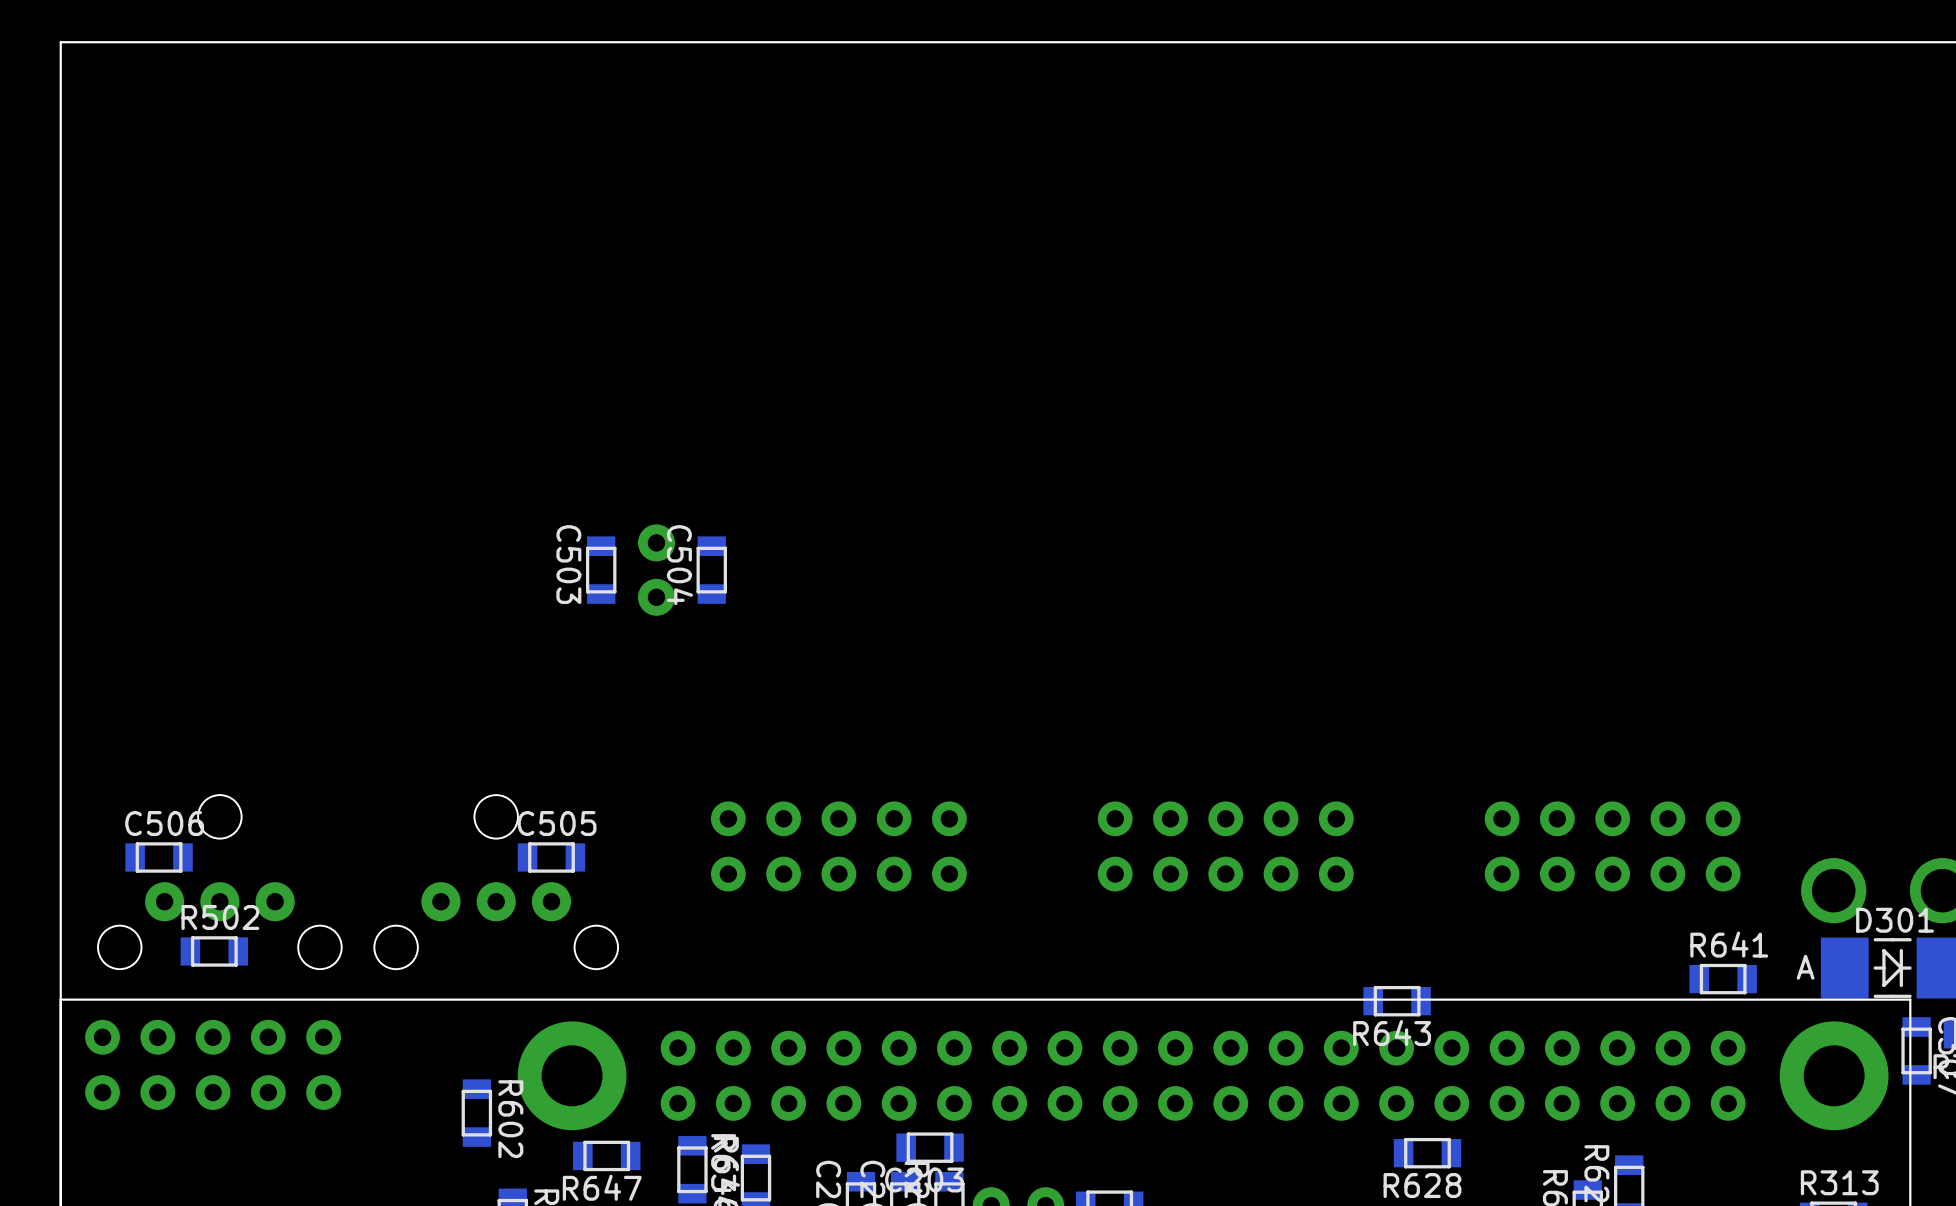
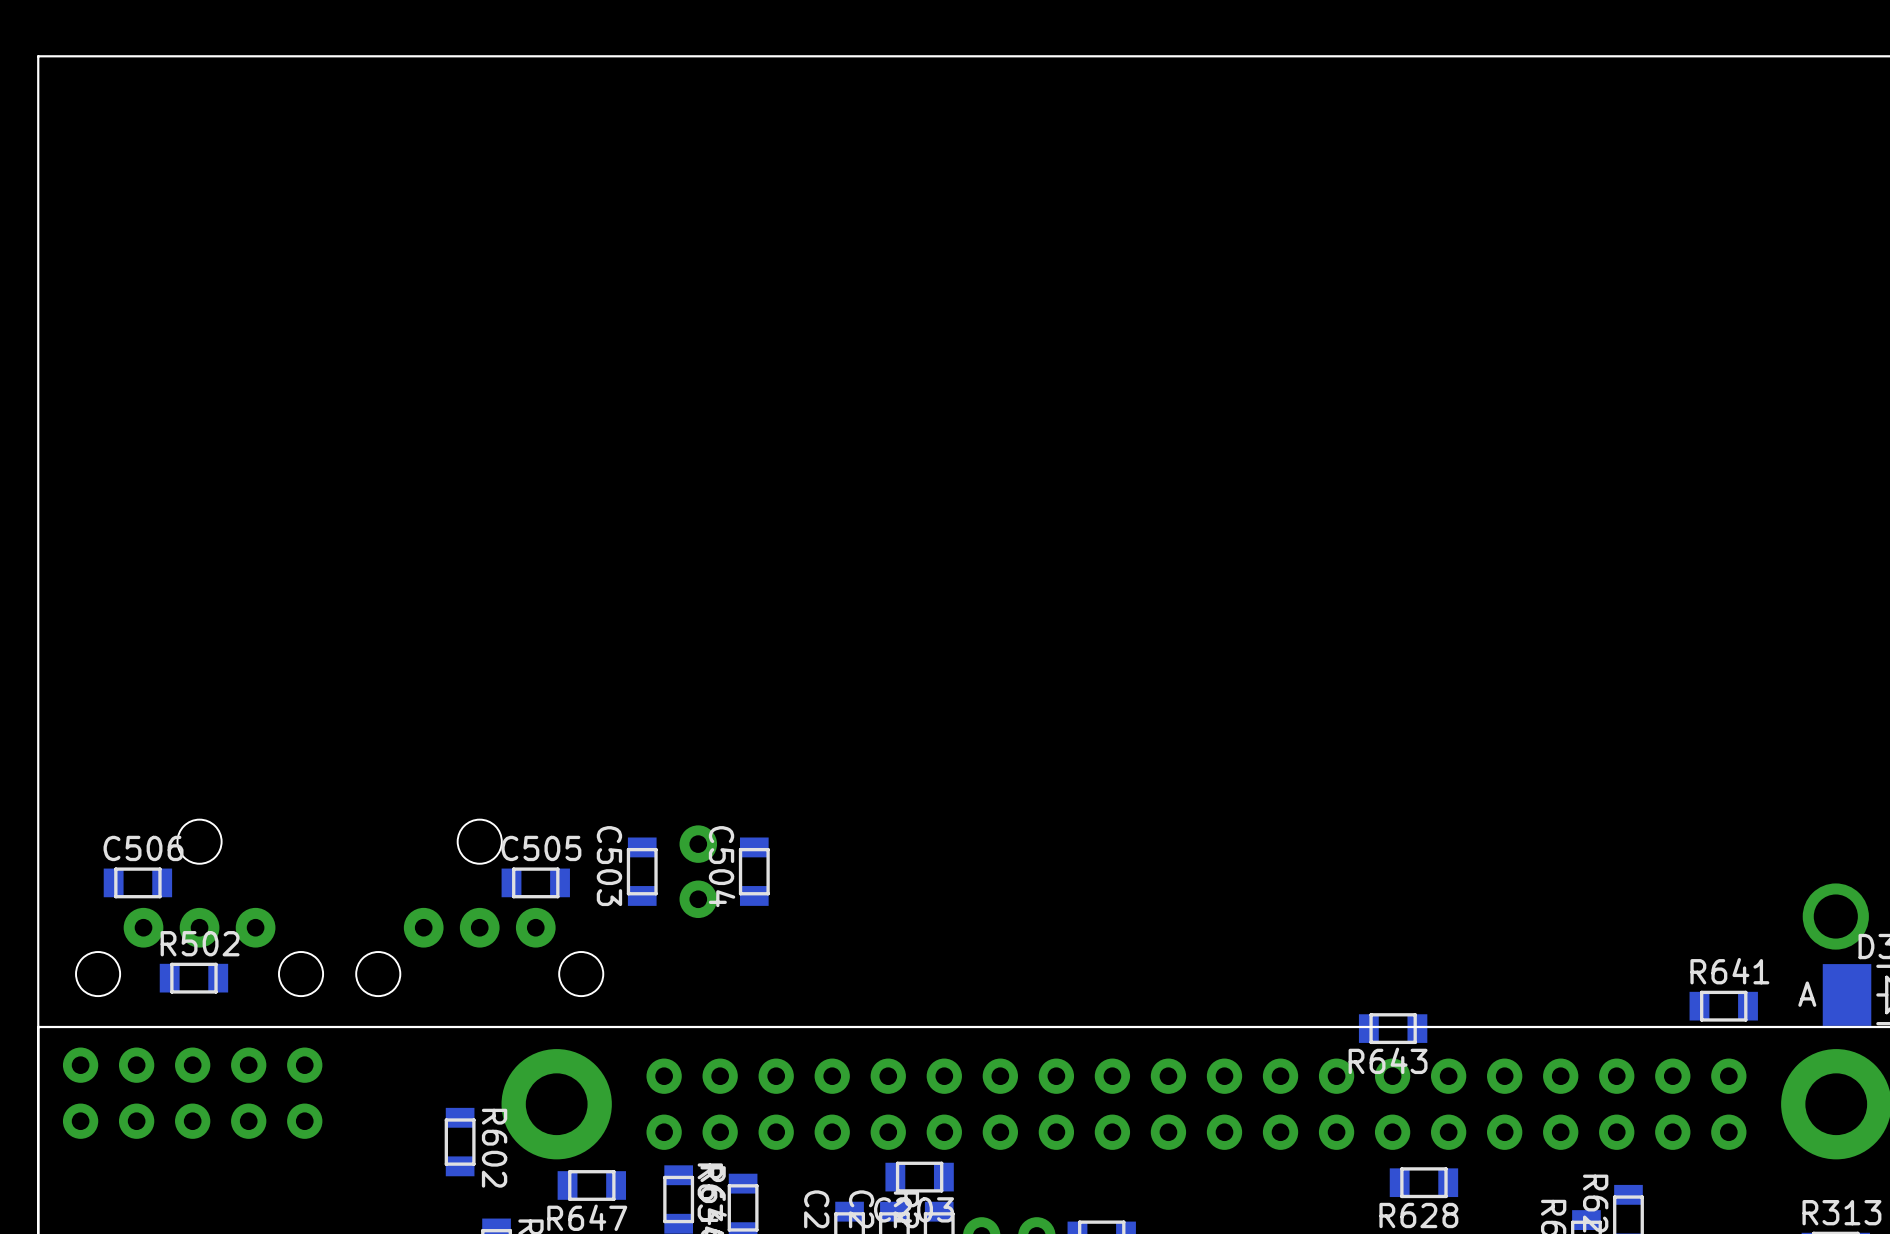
C503 position: (601, 570) -> (642, 871)
part position: (656, 570) -> (698, 871)
C504 position: (711, 570) -> (754, 871)
part: (838, 846) -> none
part: (1225, 846) -> none
part: (1612, 846) -> none

